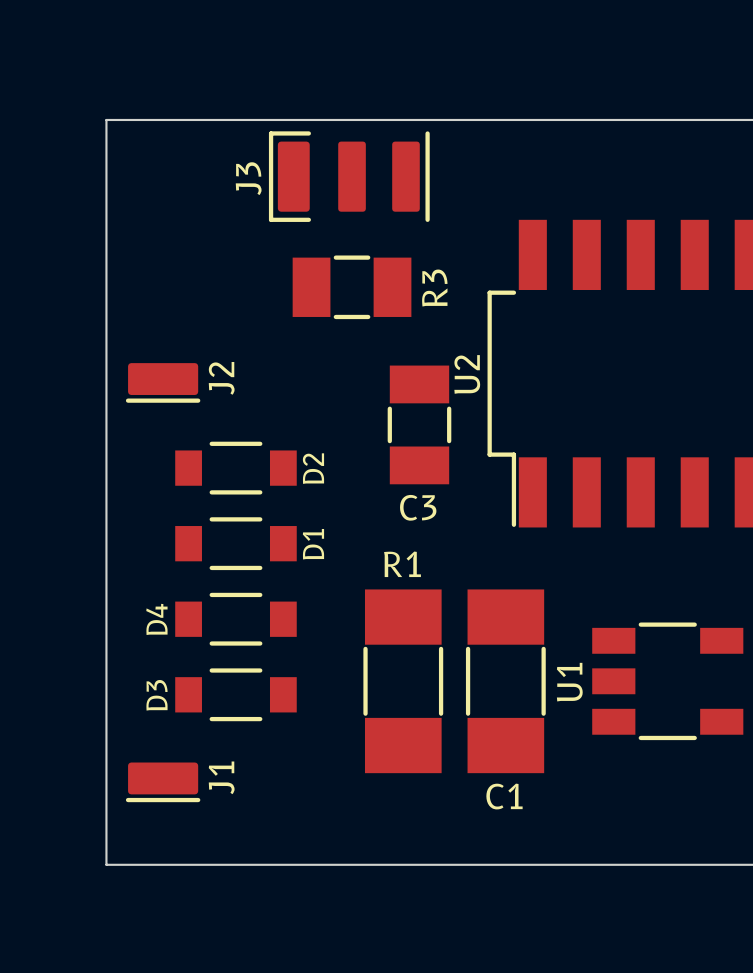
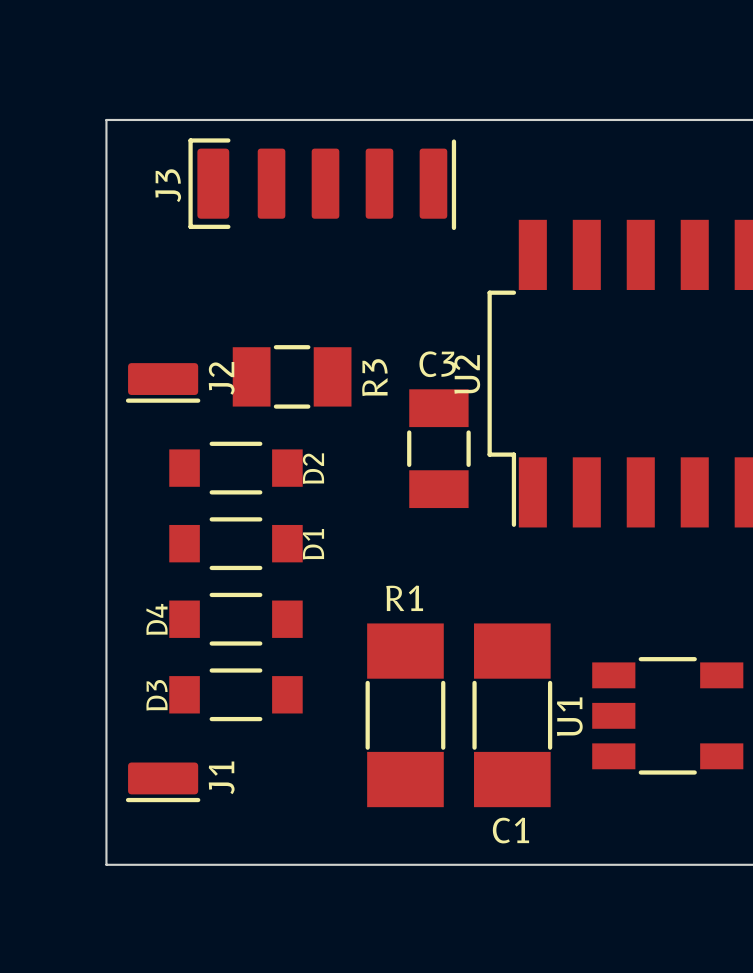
J3 footprint: [268, 131, 430, 222] -> [188, 138, 457, 231]
R3 position: (352, 287) -> (292, 376)
C3 position: (419, 424) -> (438, 448)
D2 footprint: [175, 441, 297, 495] -> [169, 441, 303, 495]
C3 name position: C3 (418, 507) -> C3 (437, 364)
D1 footprint: [175, 517, 297, 571] -> [169, 517, 303, 571]
D4 footprint: [175, 592, 297, 646] -> [169, 592, 303, 646]
D3 footprint: [175, 668, 297, 722] -> [169, 668, 303, 722]
R1 position: (403, 681) -> (405, 715)
C1 position: (505, 681) -> (512, 715)
U1 position: (667, 681) -> (667, 715)

